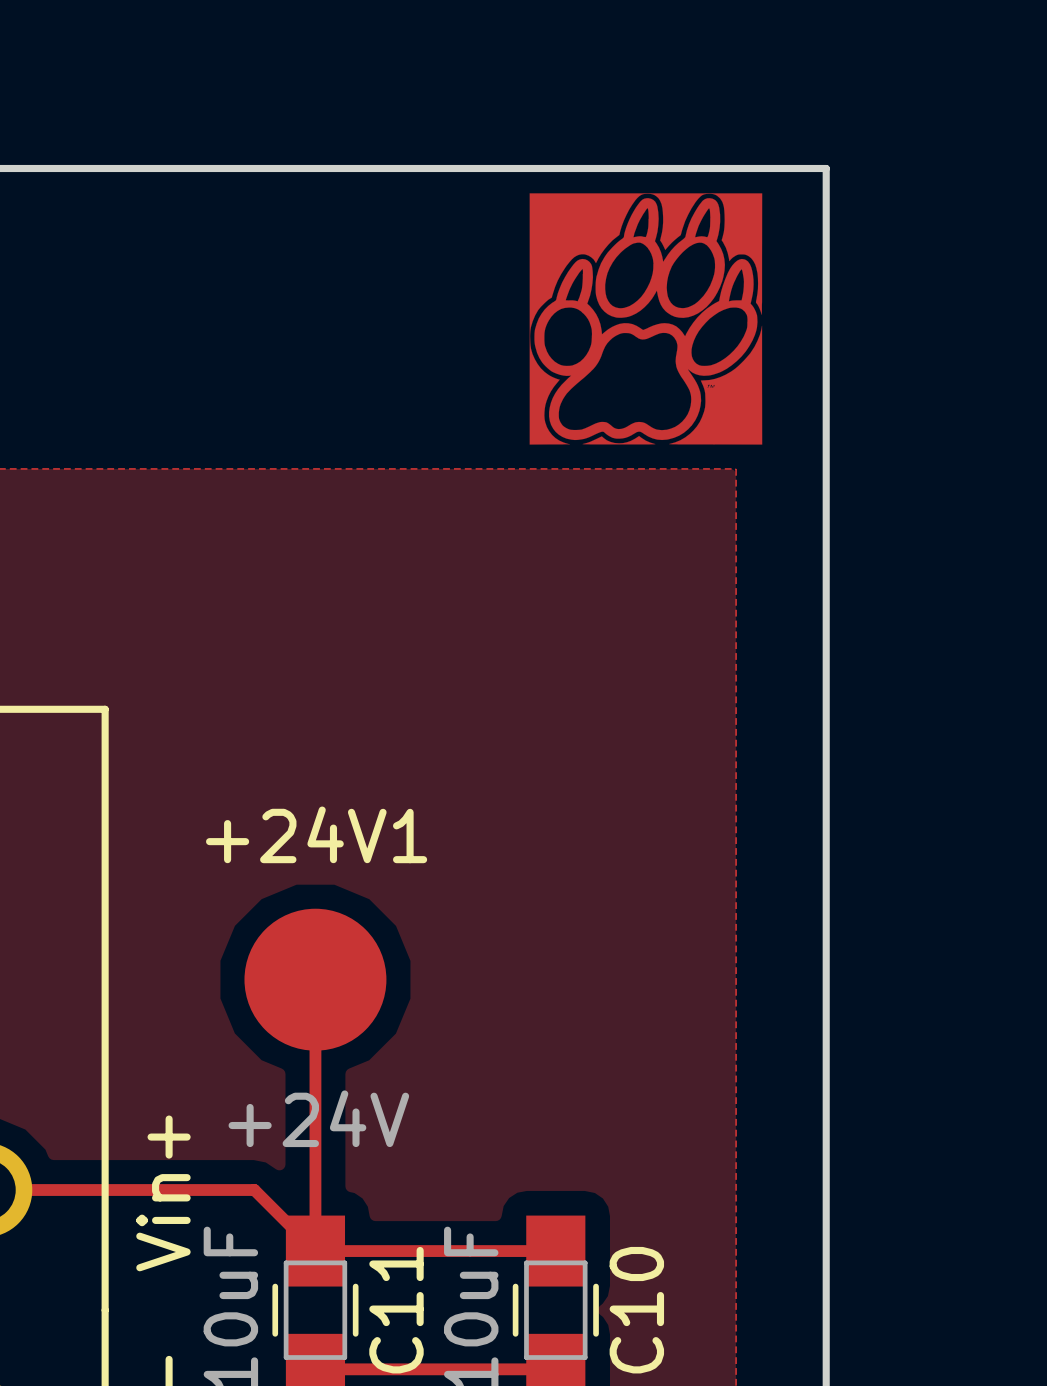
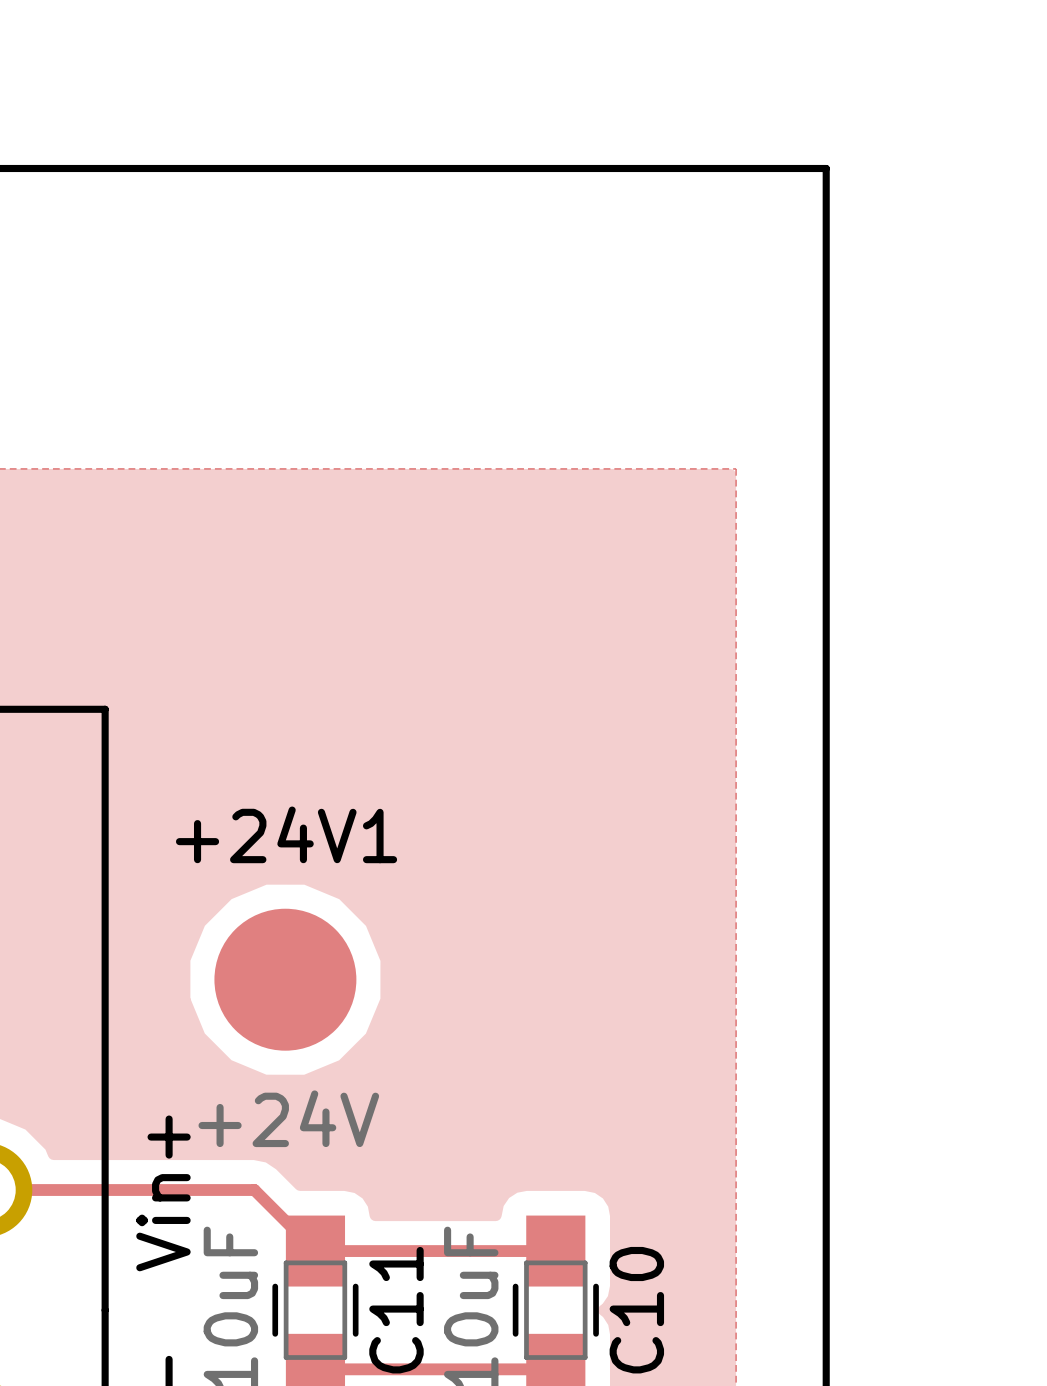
drawing: [529, 193, 763, 445] -> none
track: (315, 979) (315, 1251) -> none
+24V1 position: (315, 979) -> (285, 979)

